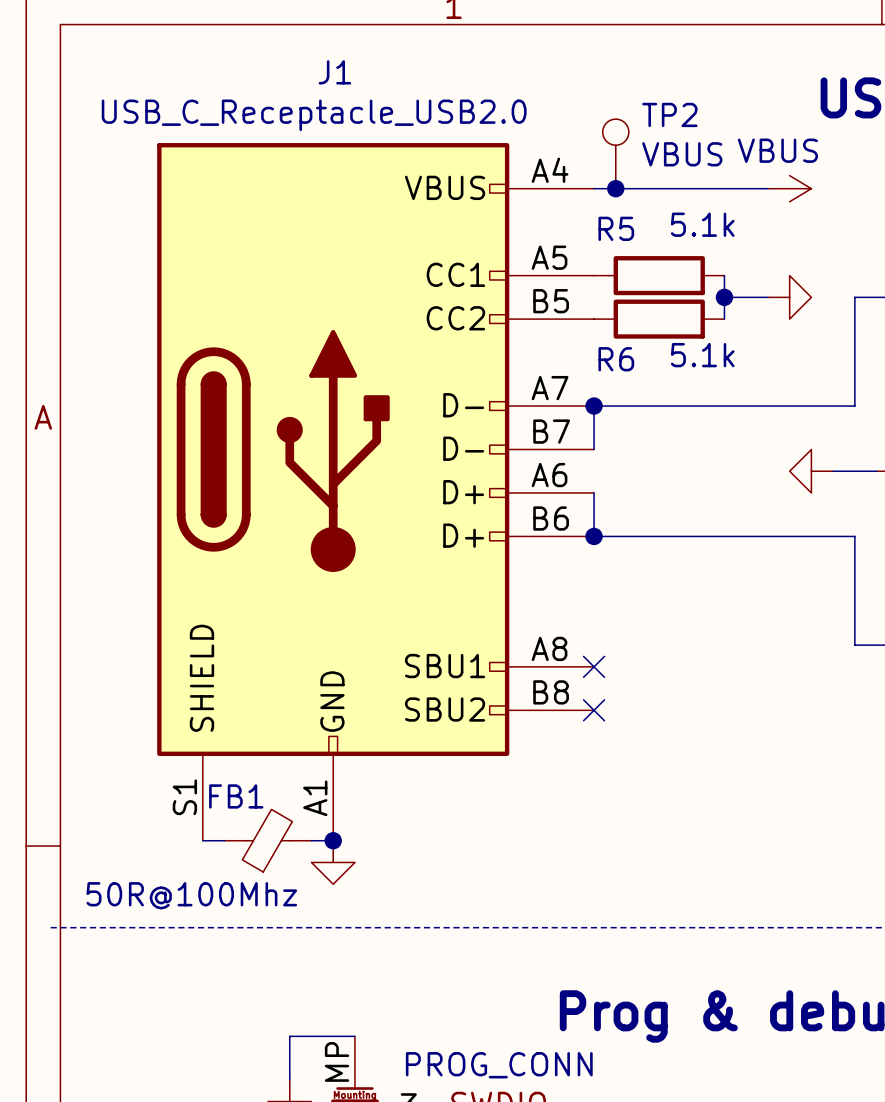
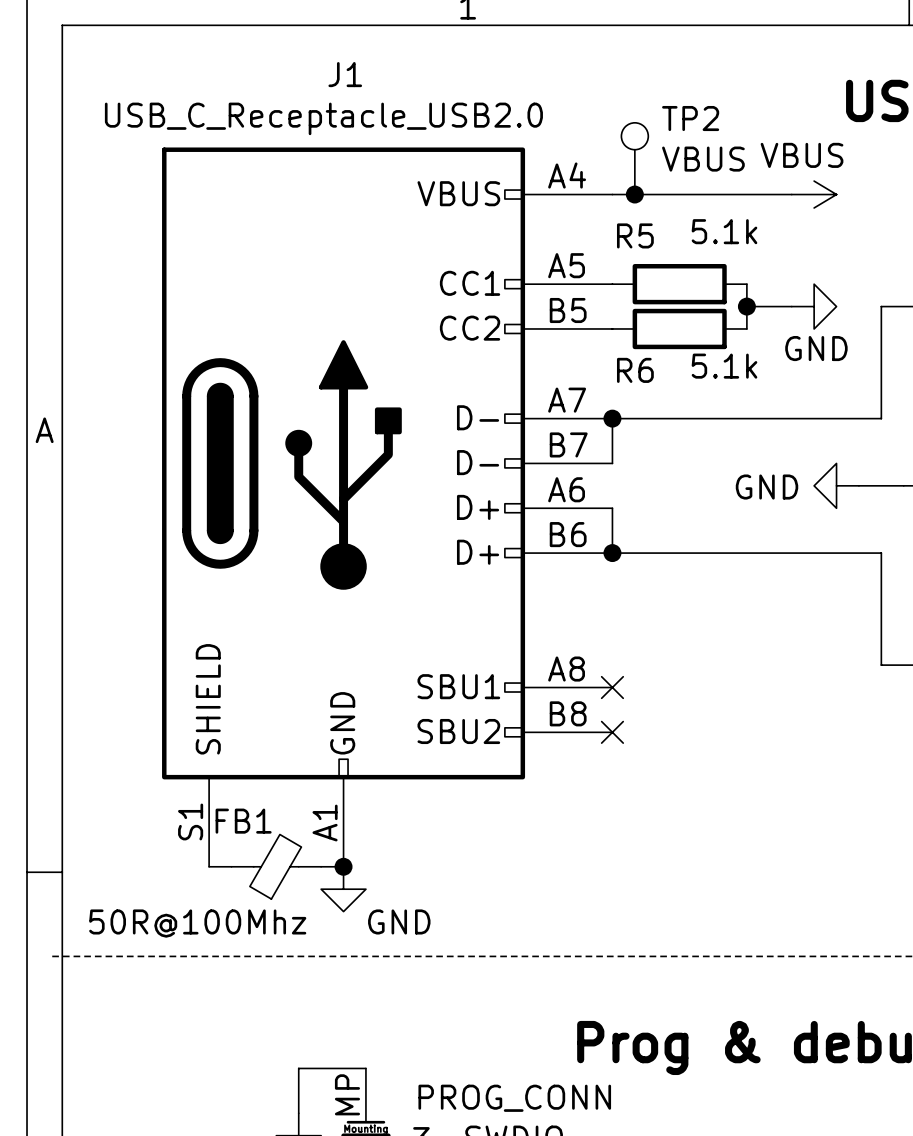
power symbol text: none -> GND (816, 348)
power symbol text: none -> GND (767, 487)
power symbol text: none -> GND (399, 921)

